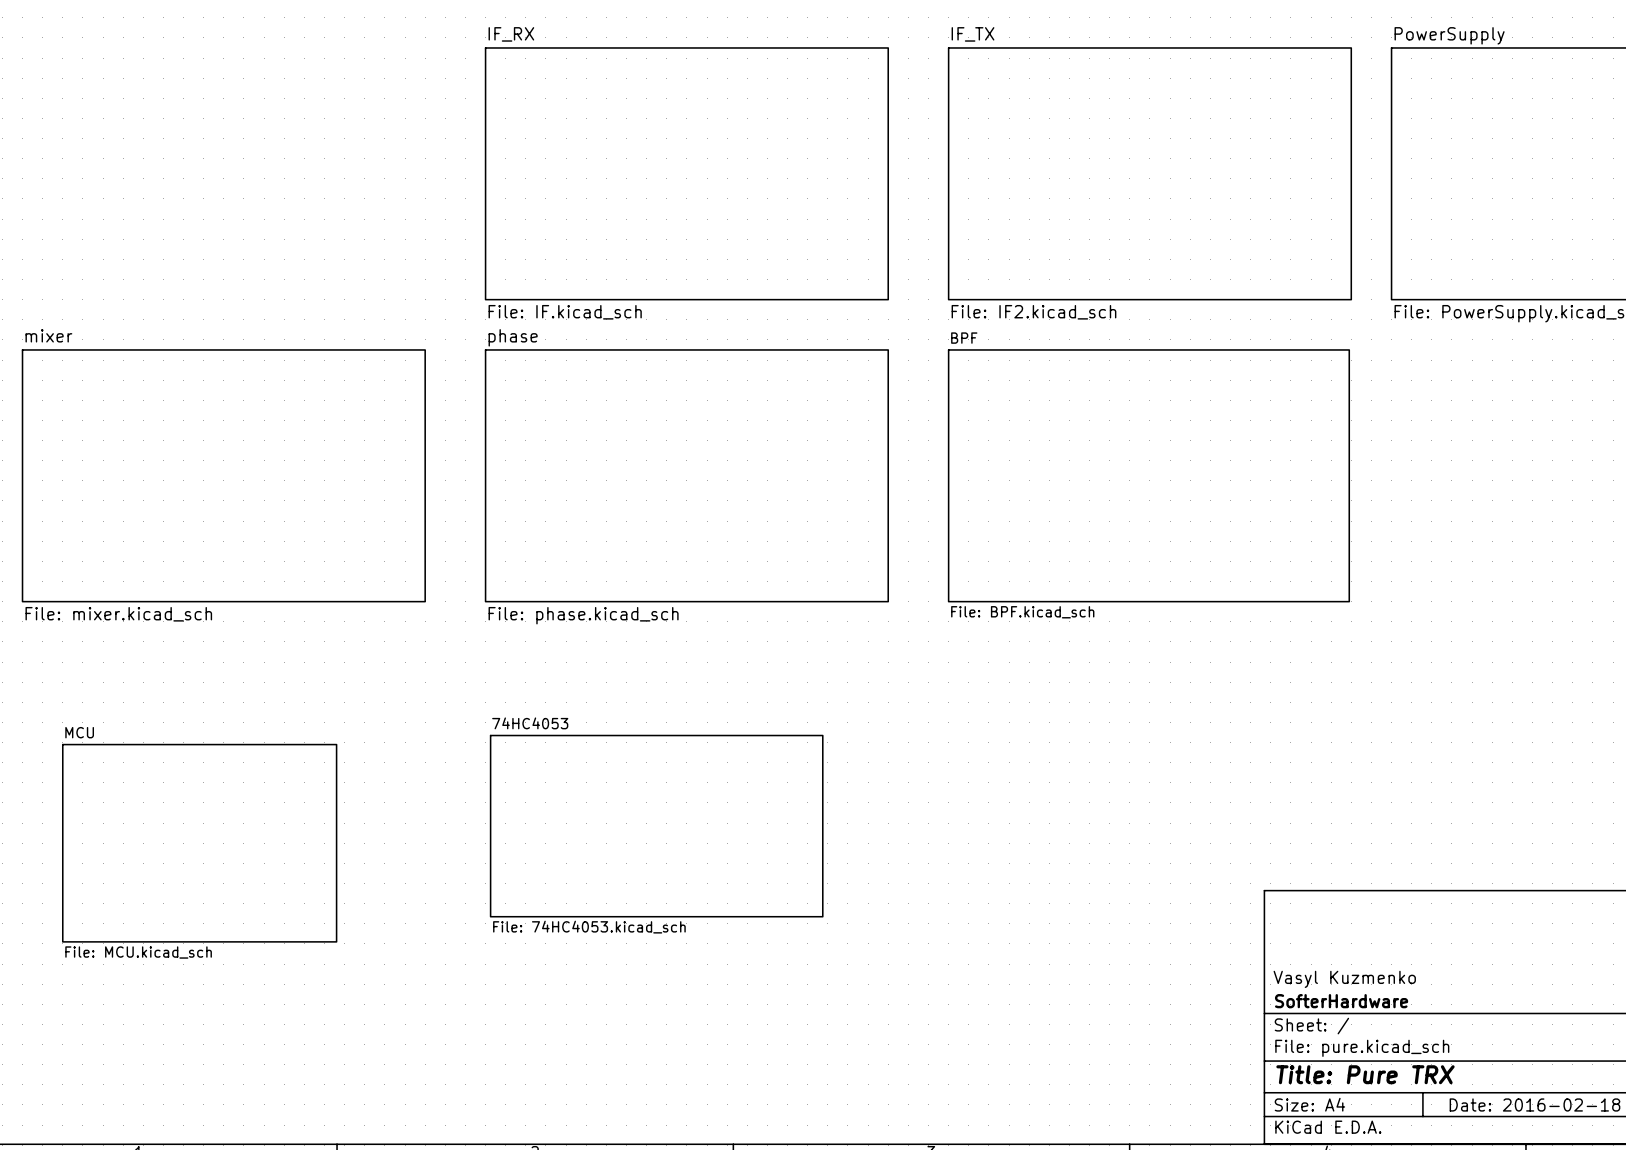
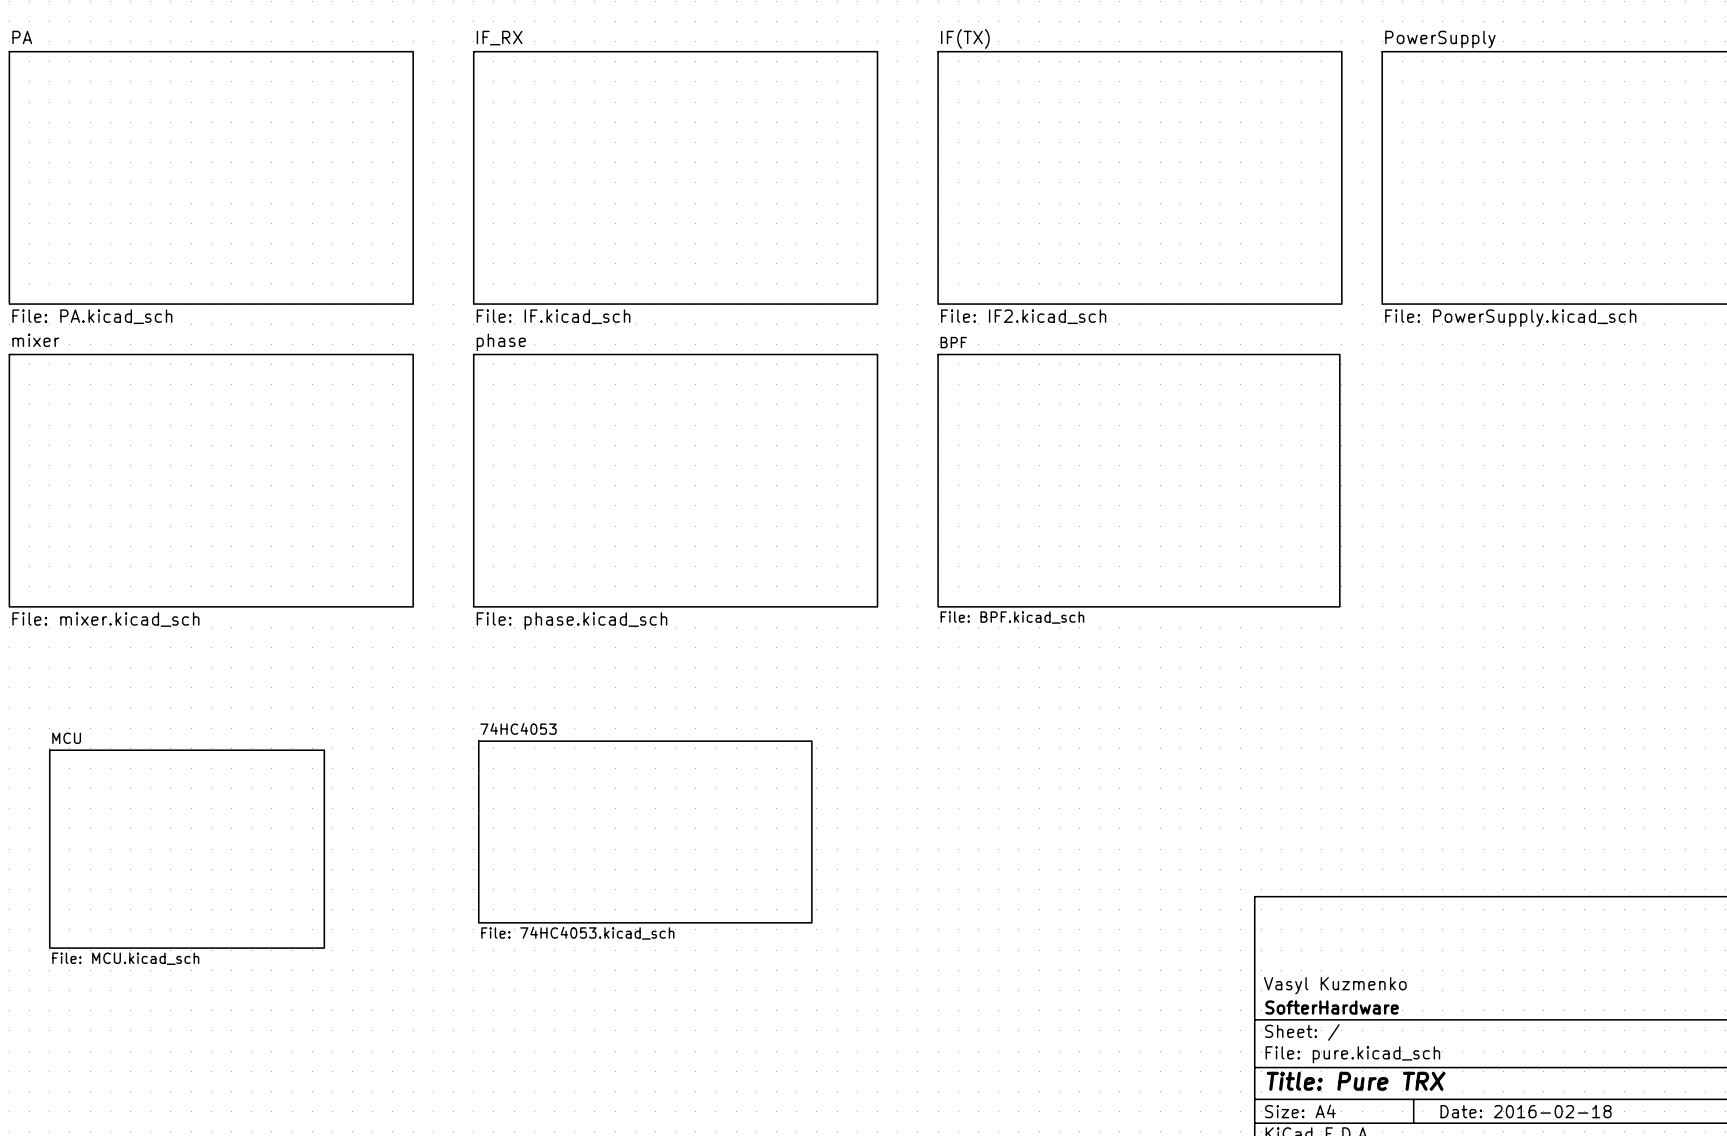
sheet IF_TX name: IF_TX (973, 34) -> IF(TX) (965, 38)
sheet PA: none -> File: PA.kicad_sch (211, 177)

